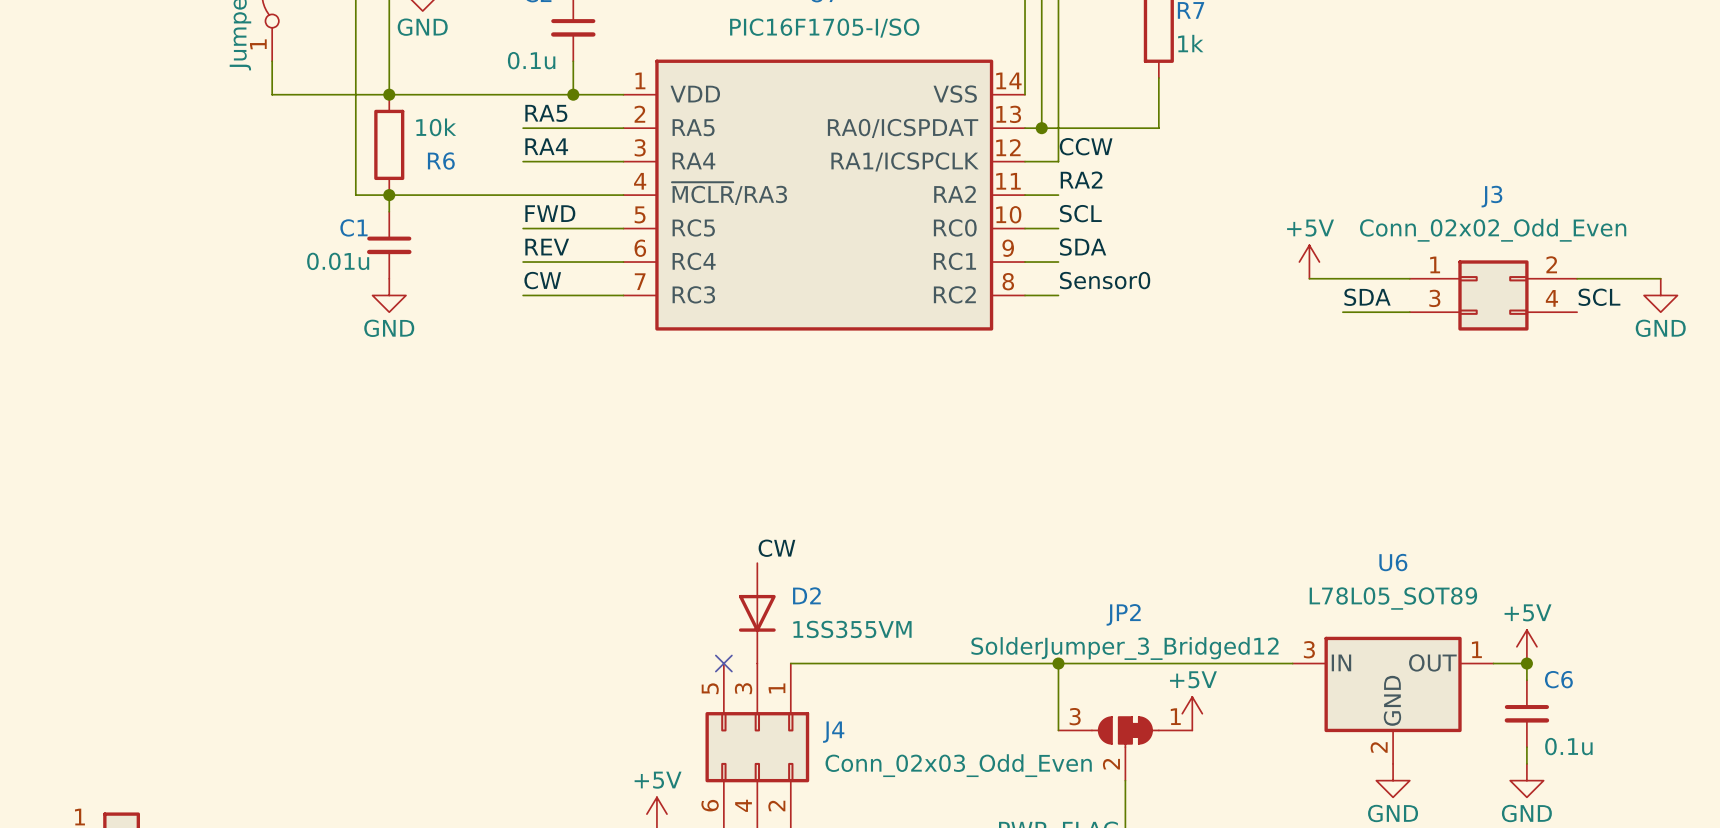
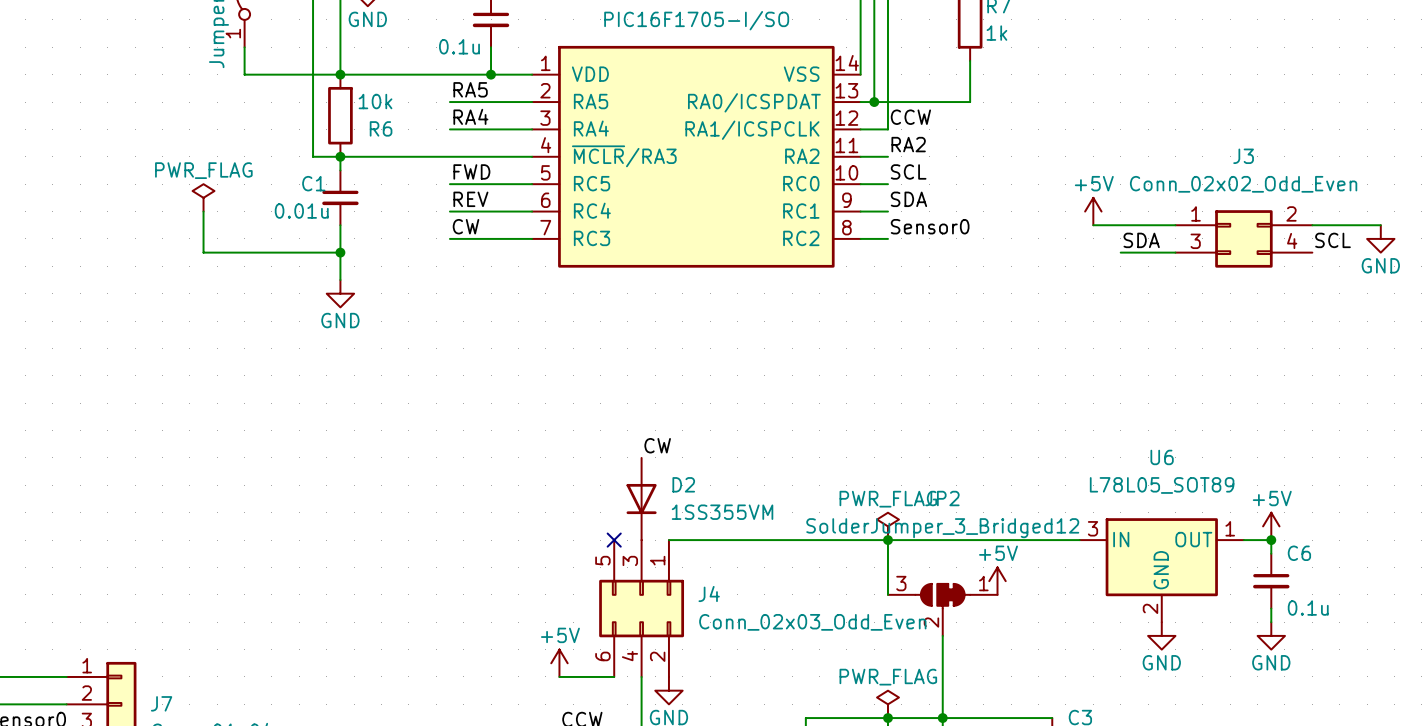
power symbol: none -> PWR_FLAG (203, 197)
wire: none -> (203, 211) (203, 252) (340, 252)
wire: none -> (340, 225) (340, 279)
power symbol position: GND (389, 295) -> GND (340, 293)
junction: none -> (340, 252)
power symbol: none -> PWR_FLAG (887, 526)

